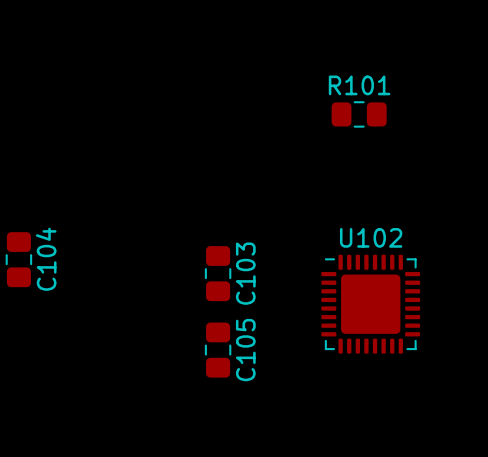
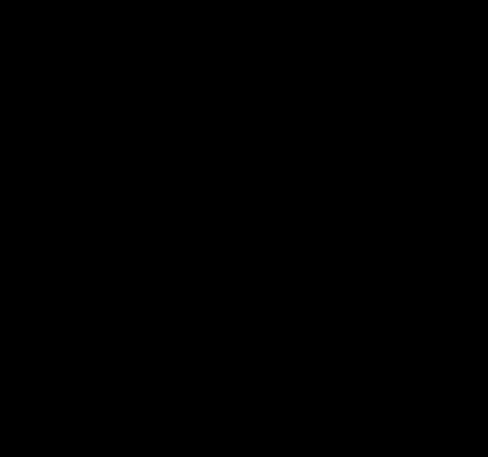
R101: (359, 114) -> none
C104: (18, 259) -> none
C103: (218, 273) -> none
U102: (370, 304) -> none
C105: (218, 350) -> none

